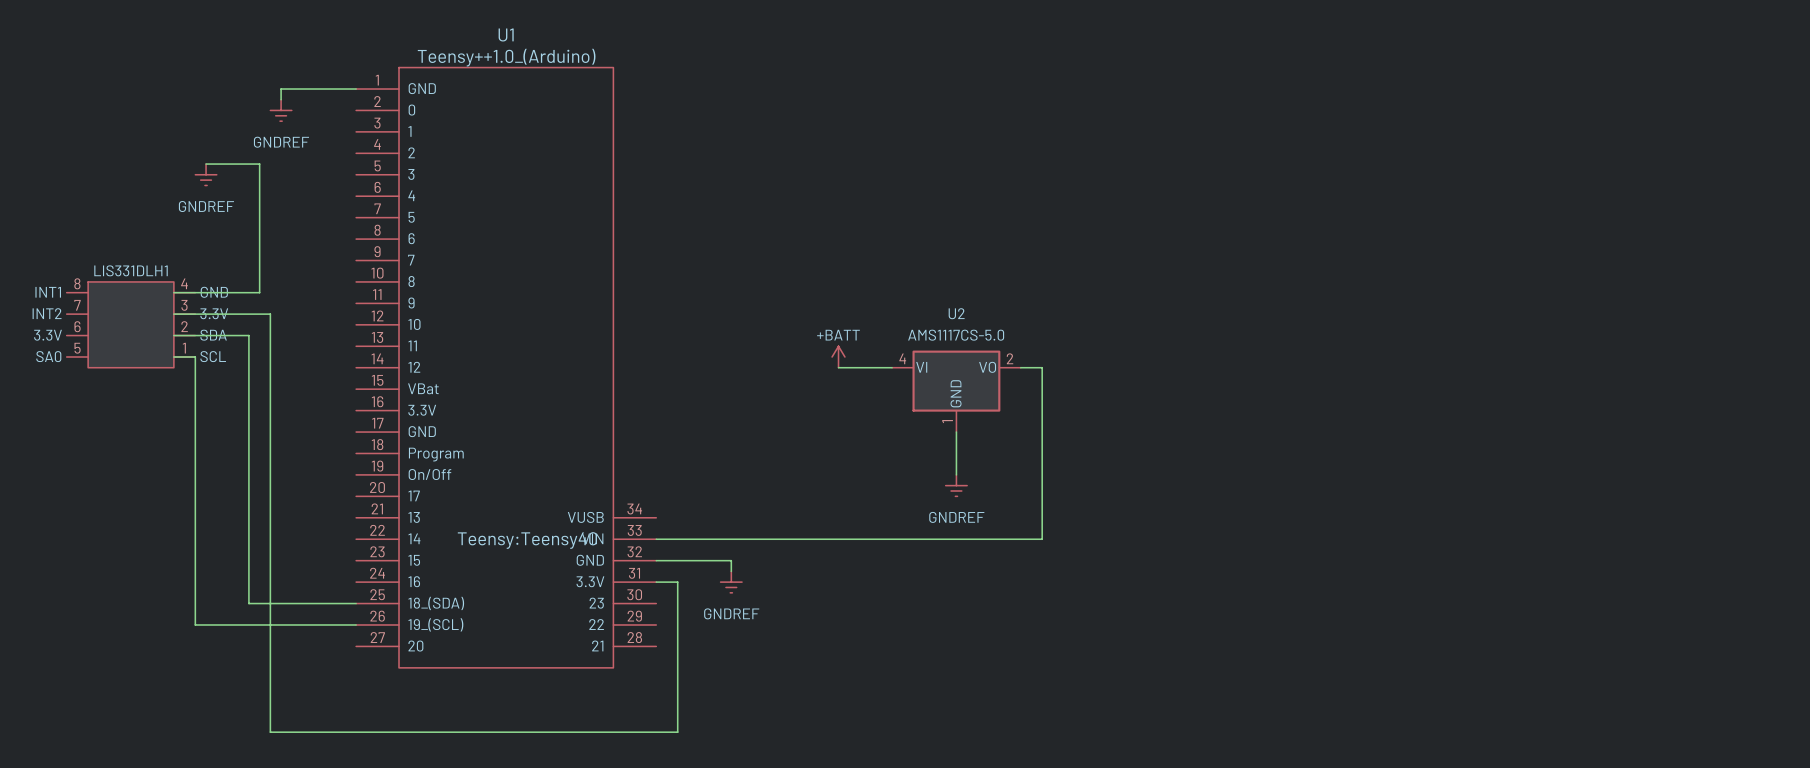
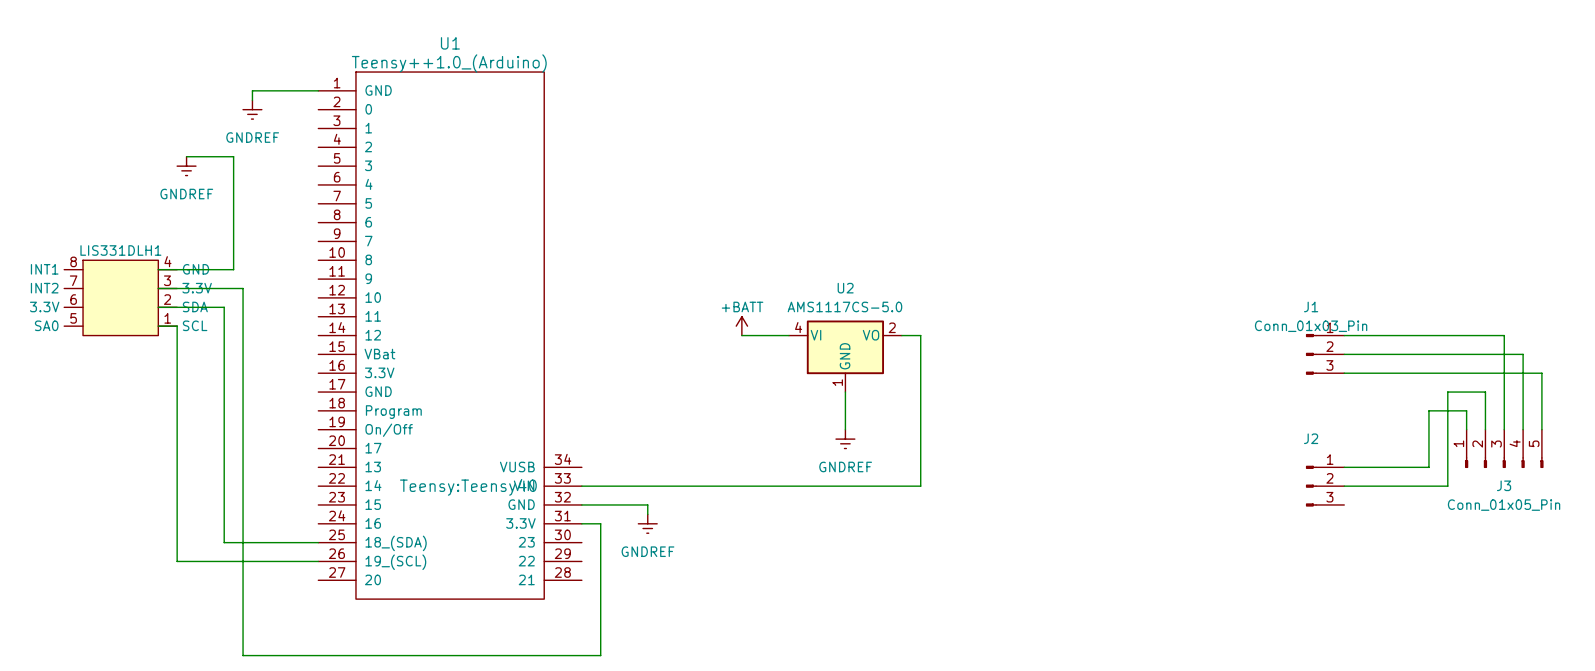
wire: none -> (1344, 335) (1504, 335) (1504, 429)
J1: none -> Conn_01x03_Pin (1325, 354)
wire: none -> (1344, 354) (1523, 354) (1523, 429)
wire: none -> (1344, 373) (1541, 373) (1541, 429)
wire: none -> (1466, 429) (1466, 410) (1428, 410) (1428, 467) (1344, 467)
wire: none -> (1485, 429) (1485, 392) (1447, 392) (1447, 486) (1344, 486)
J3: none -> Conn_01x05_Pin (1504, 448)
J2: none -> (1325, 486)

